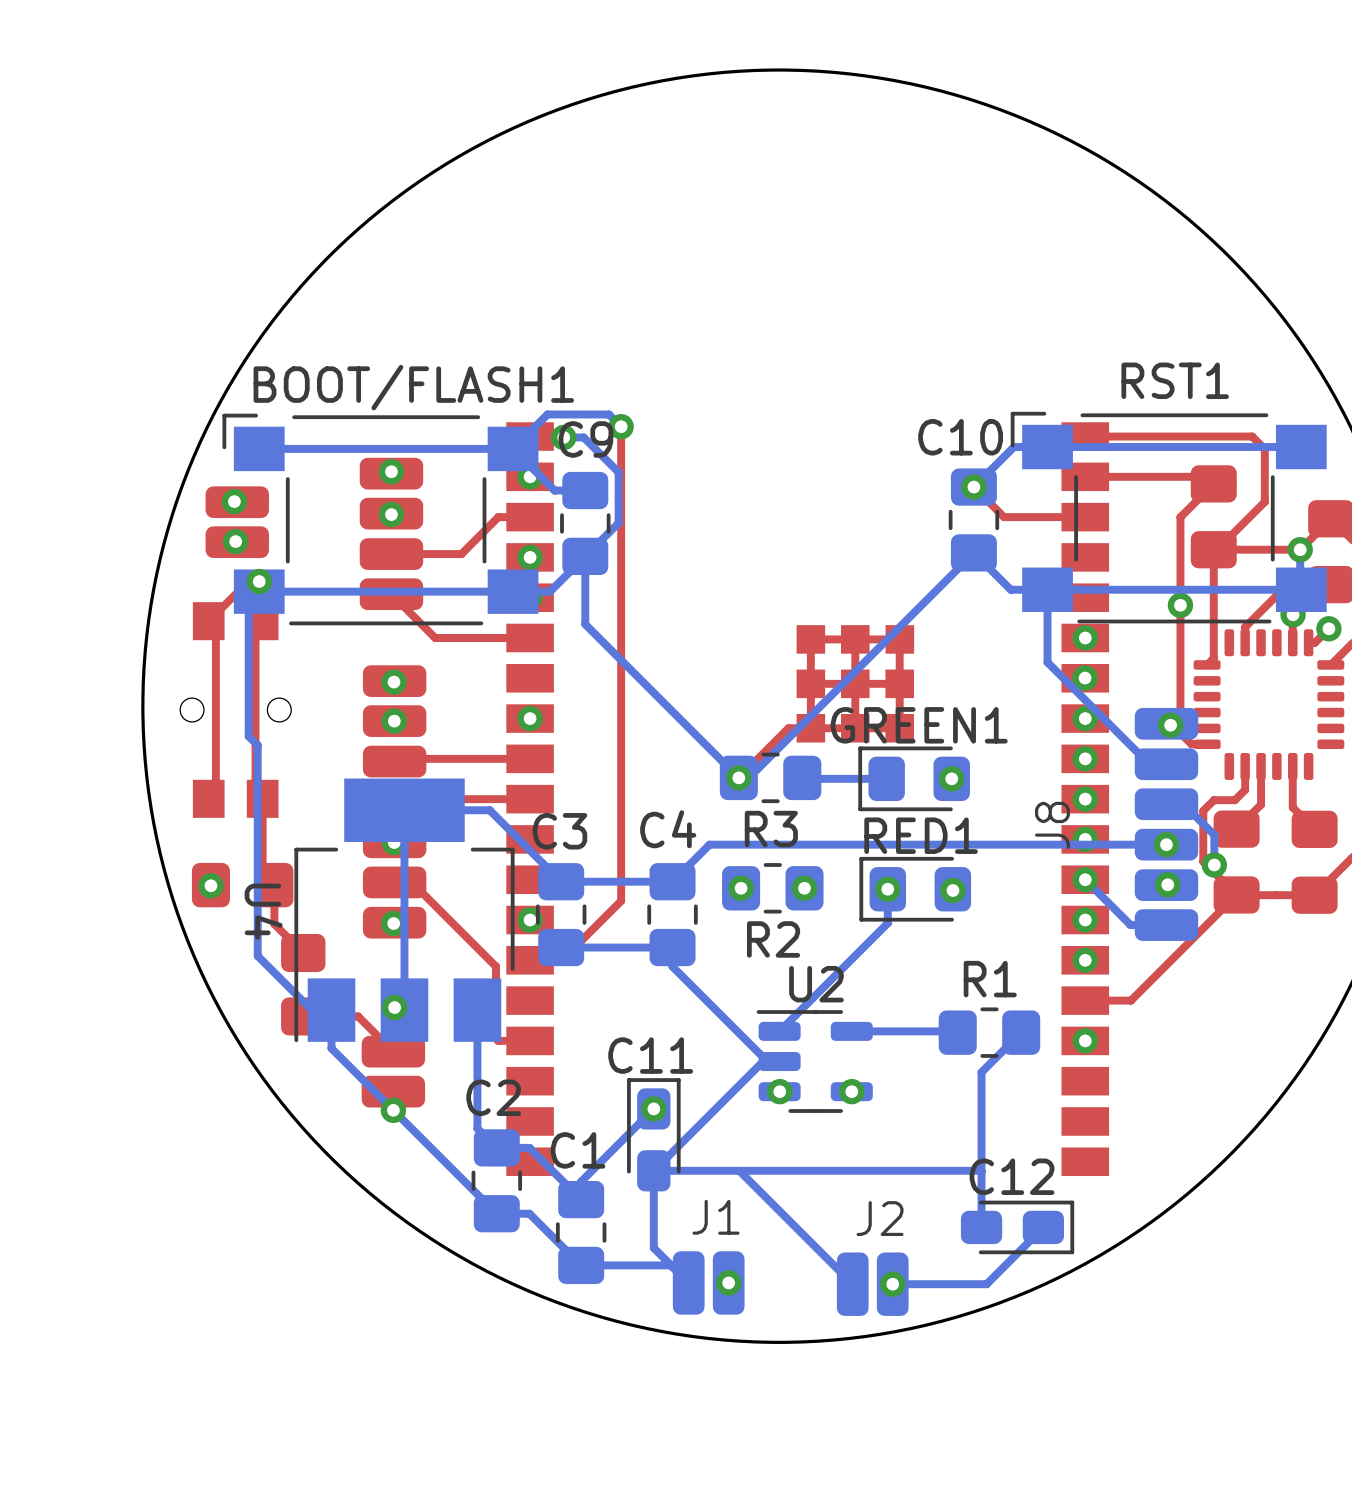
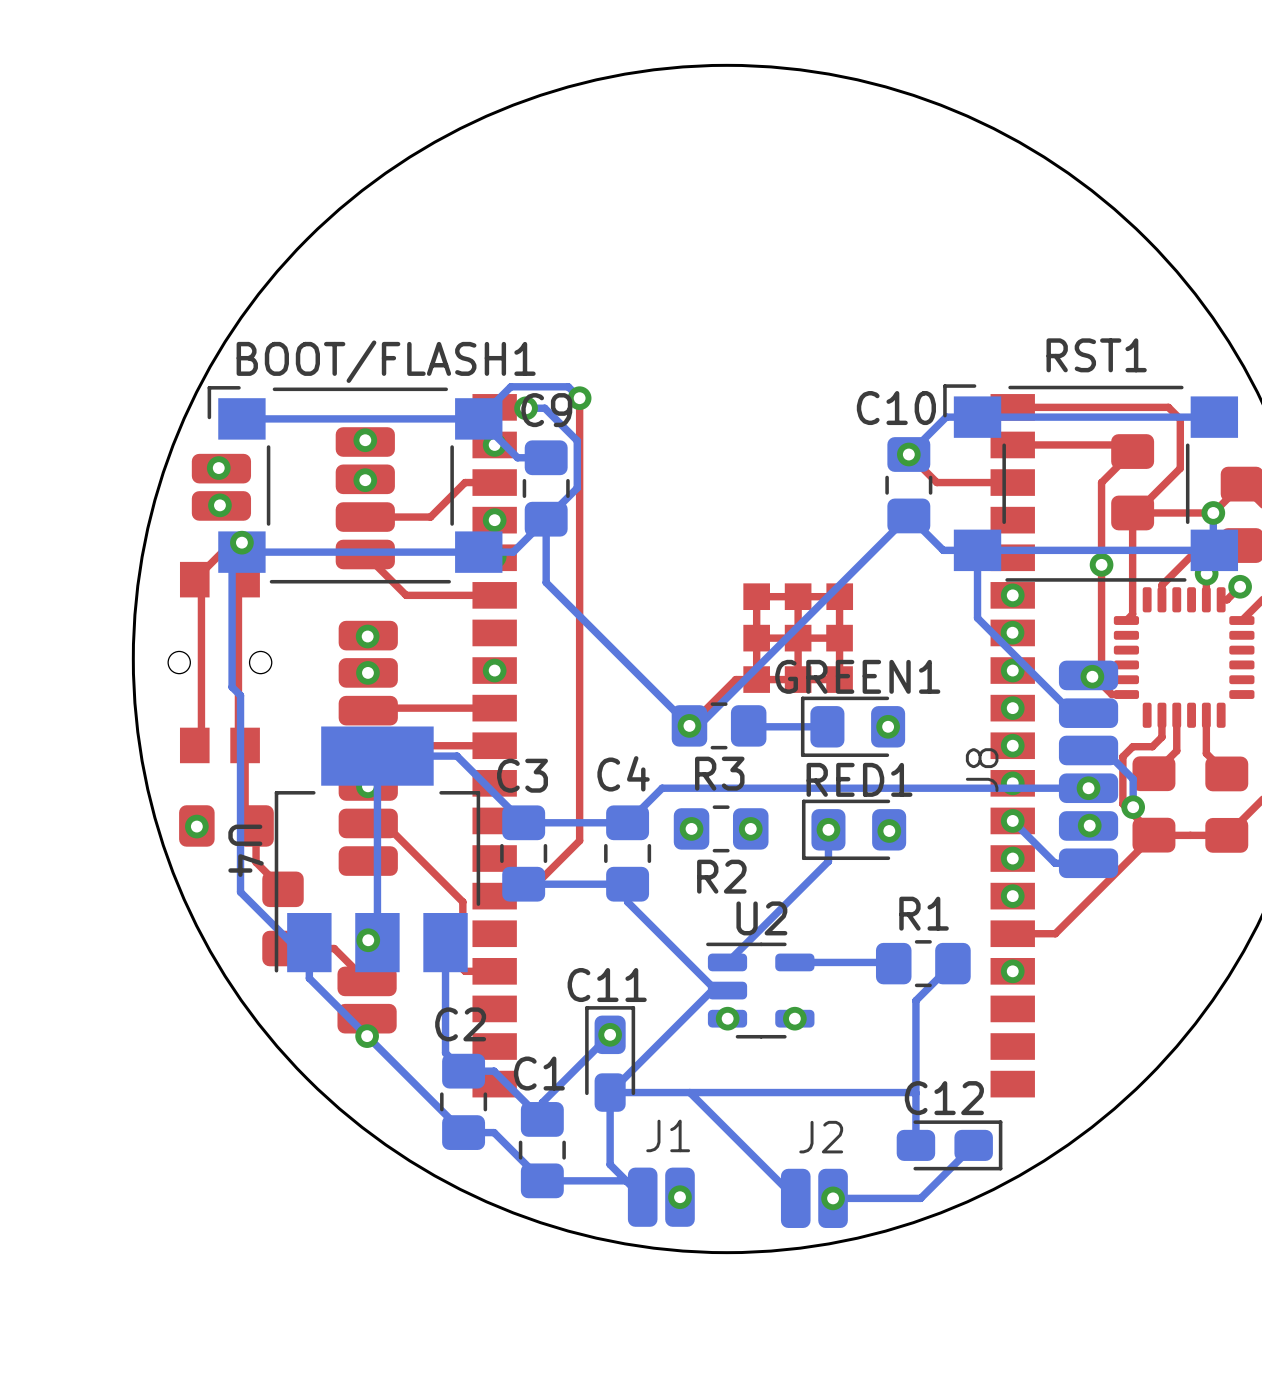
via: (530, 920) -> none
via: (393, 923) -> none

